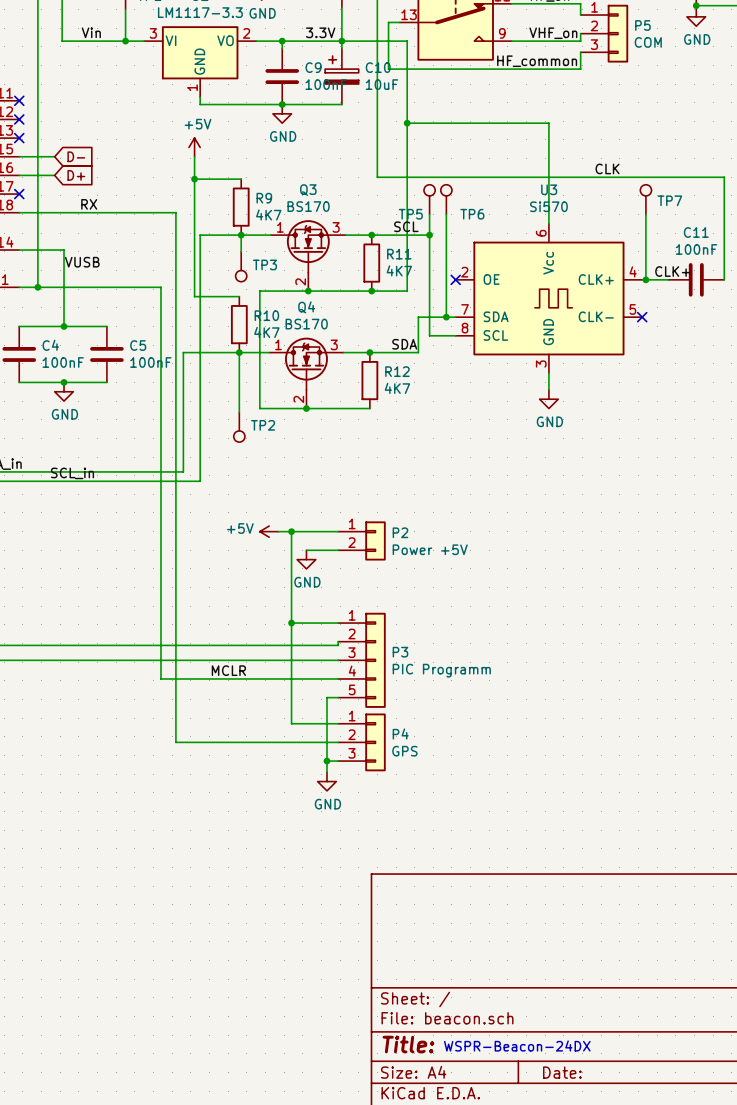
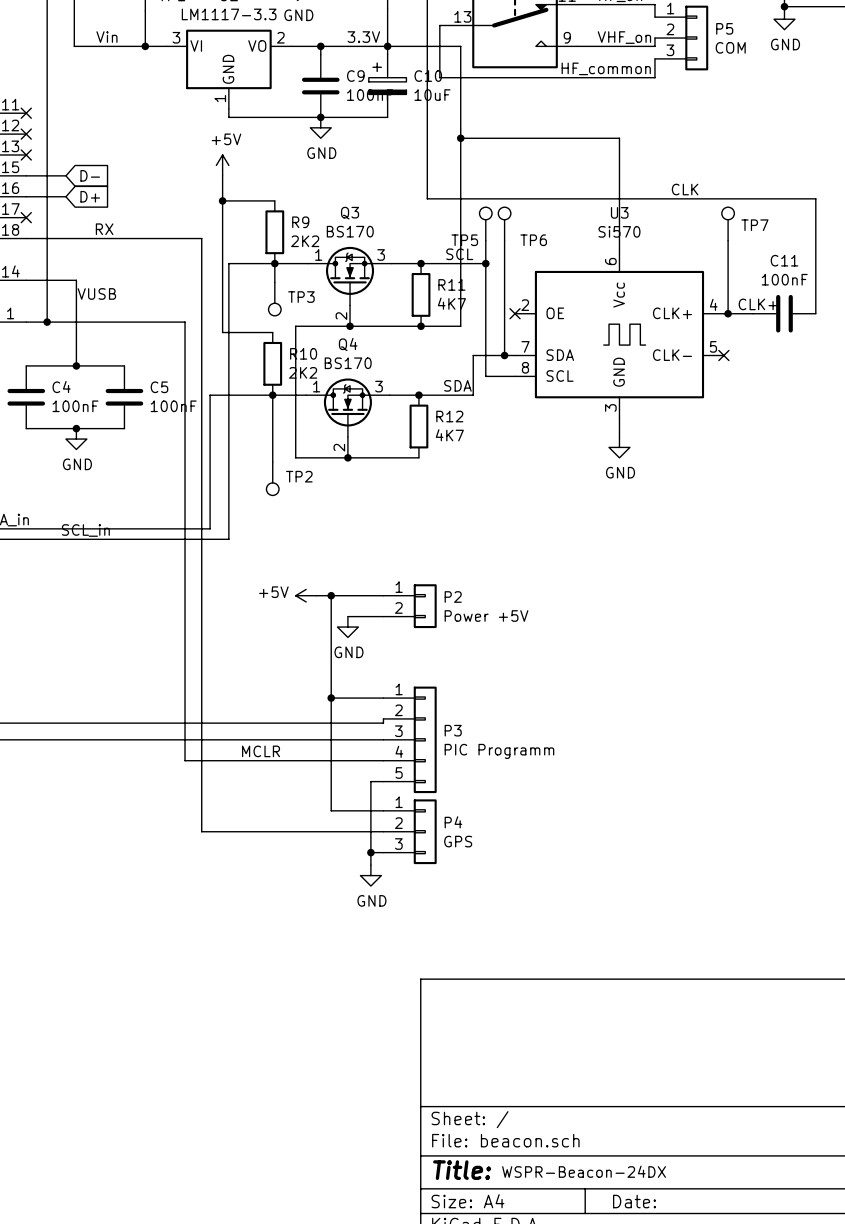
R9 value: 4K7 (268, 214) -> 2K2 (305, 241)
R10 value: 4K7 (266, 332) -> 2K2 (303, 372)

